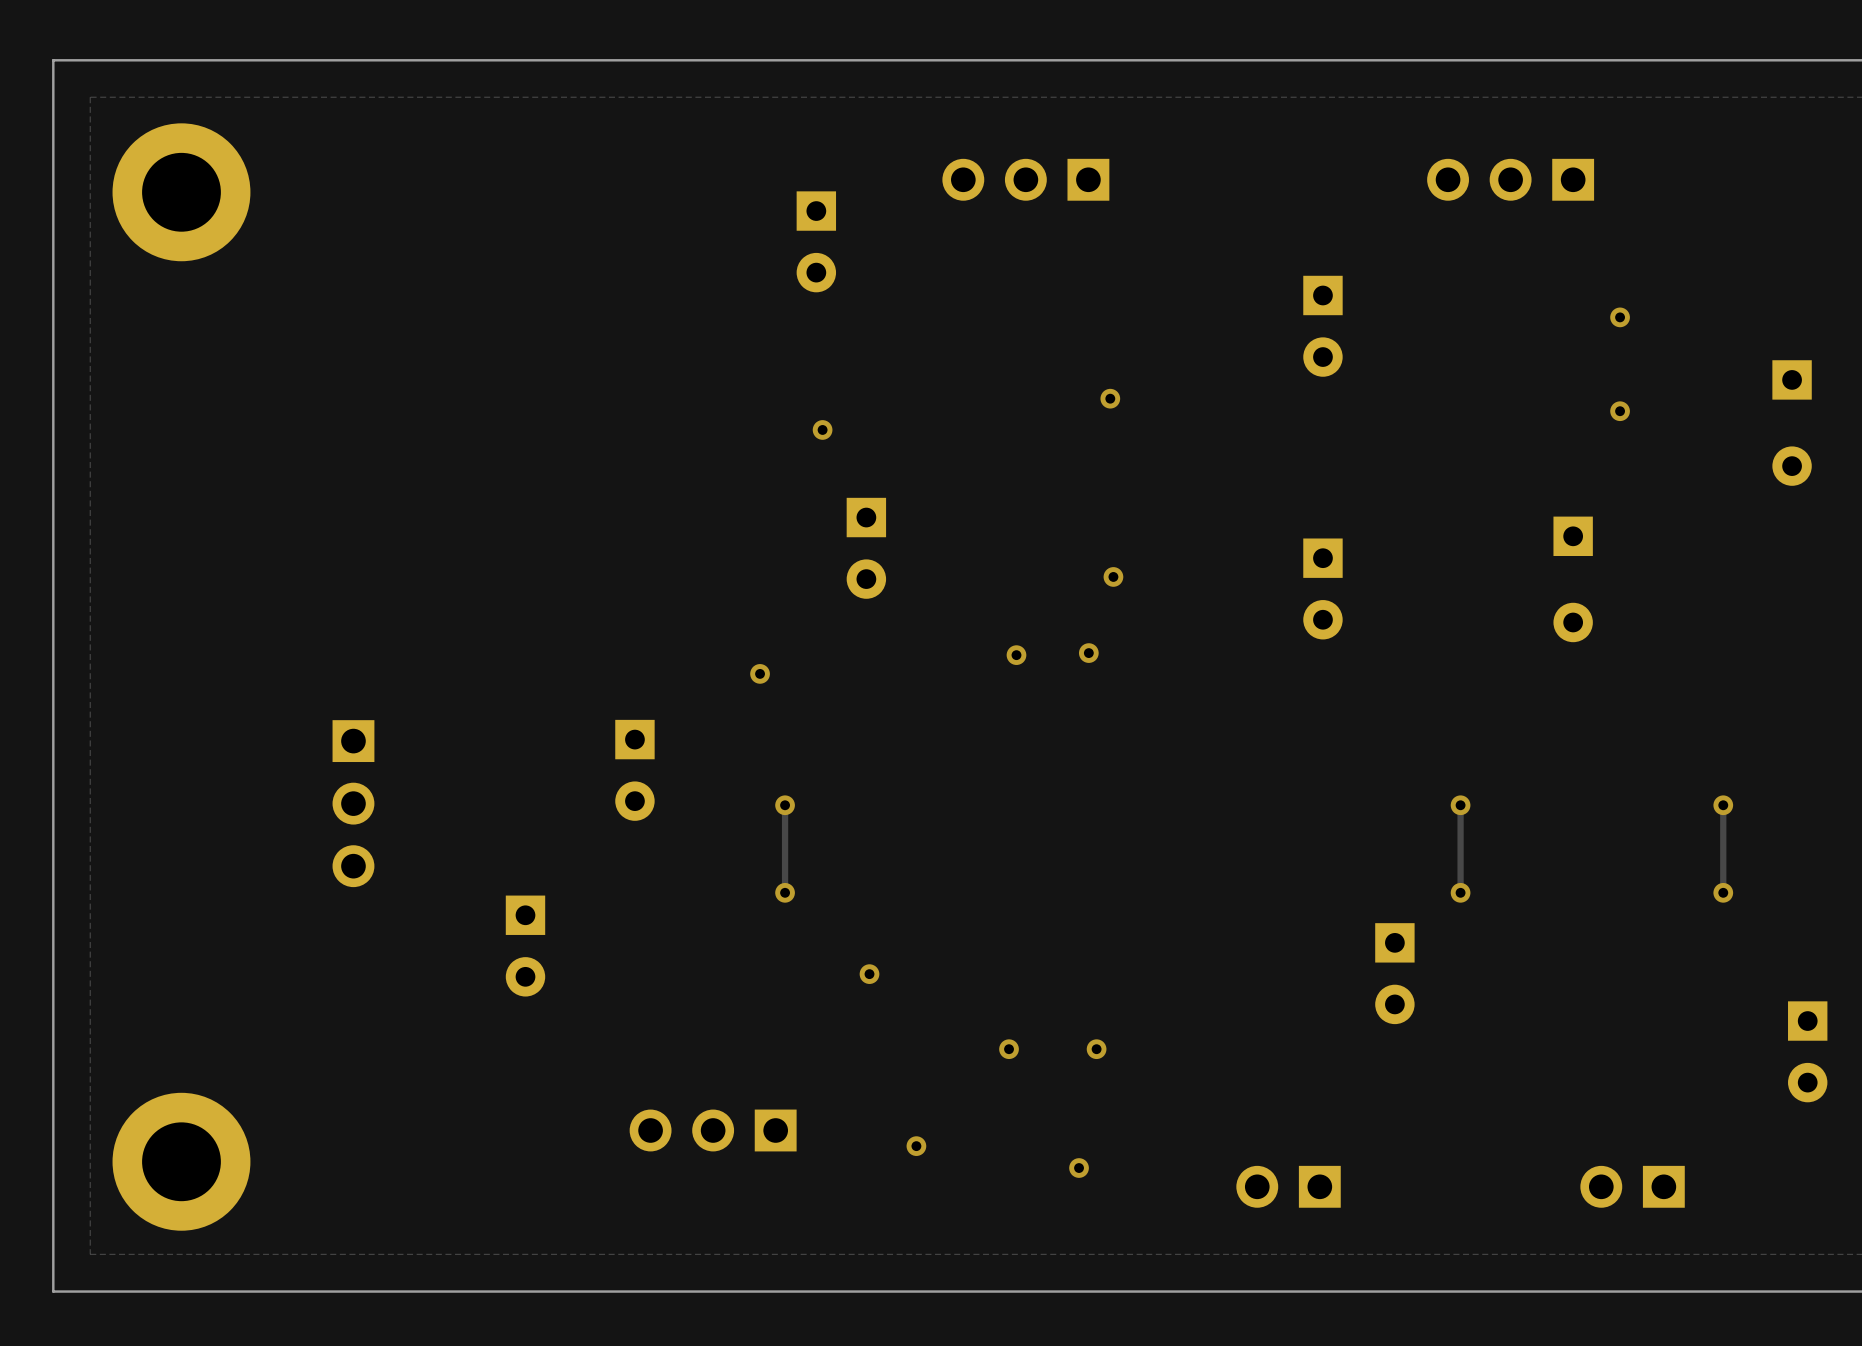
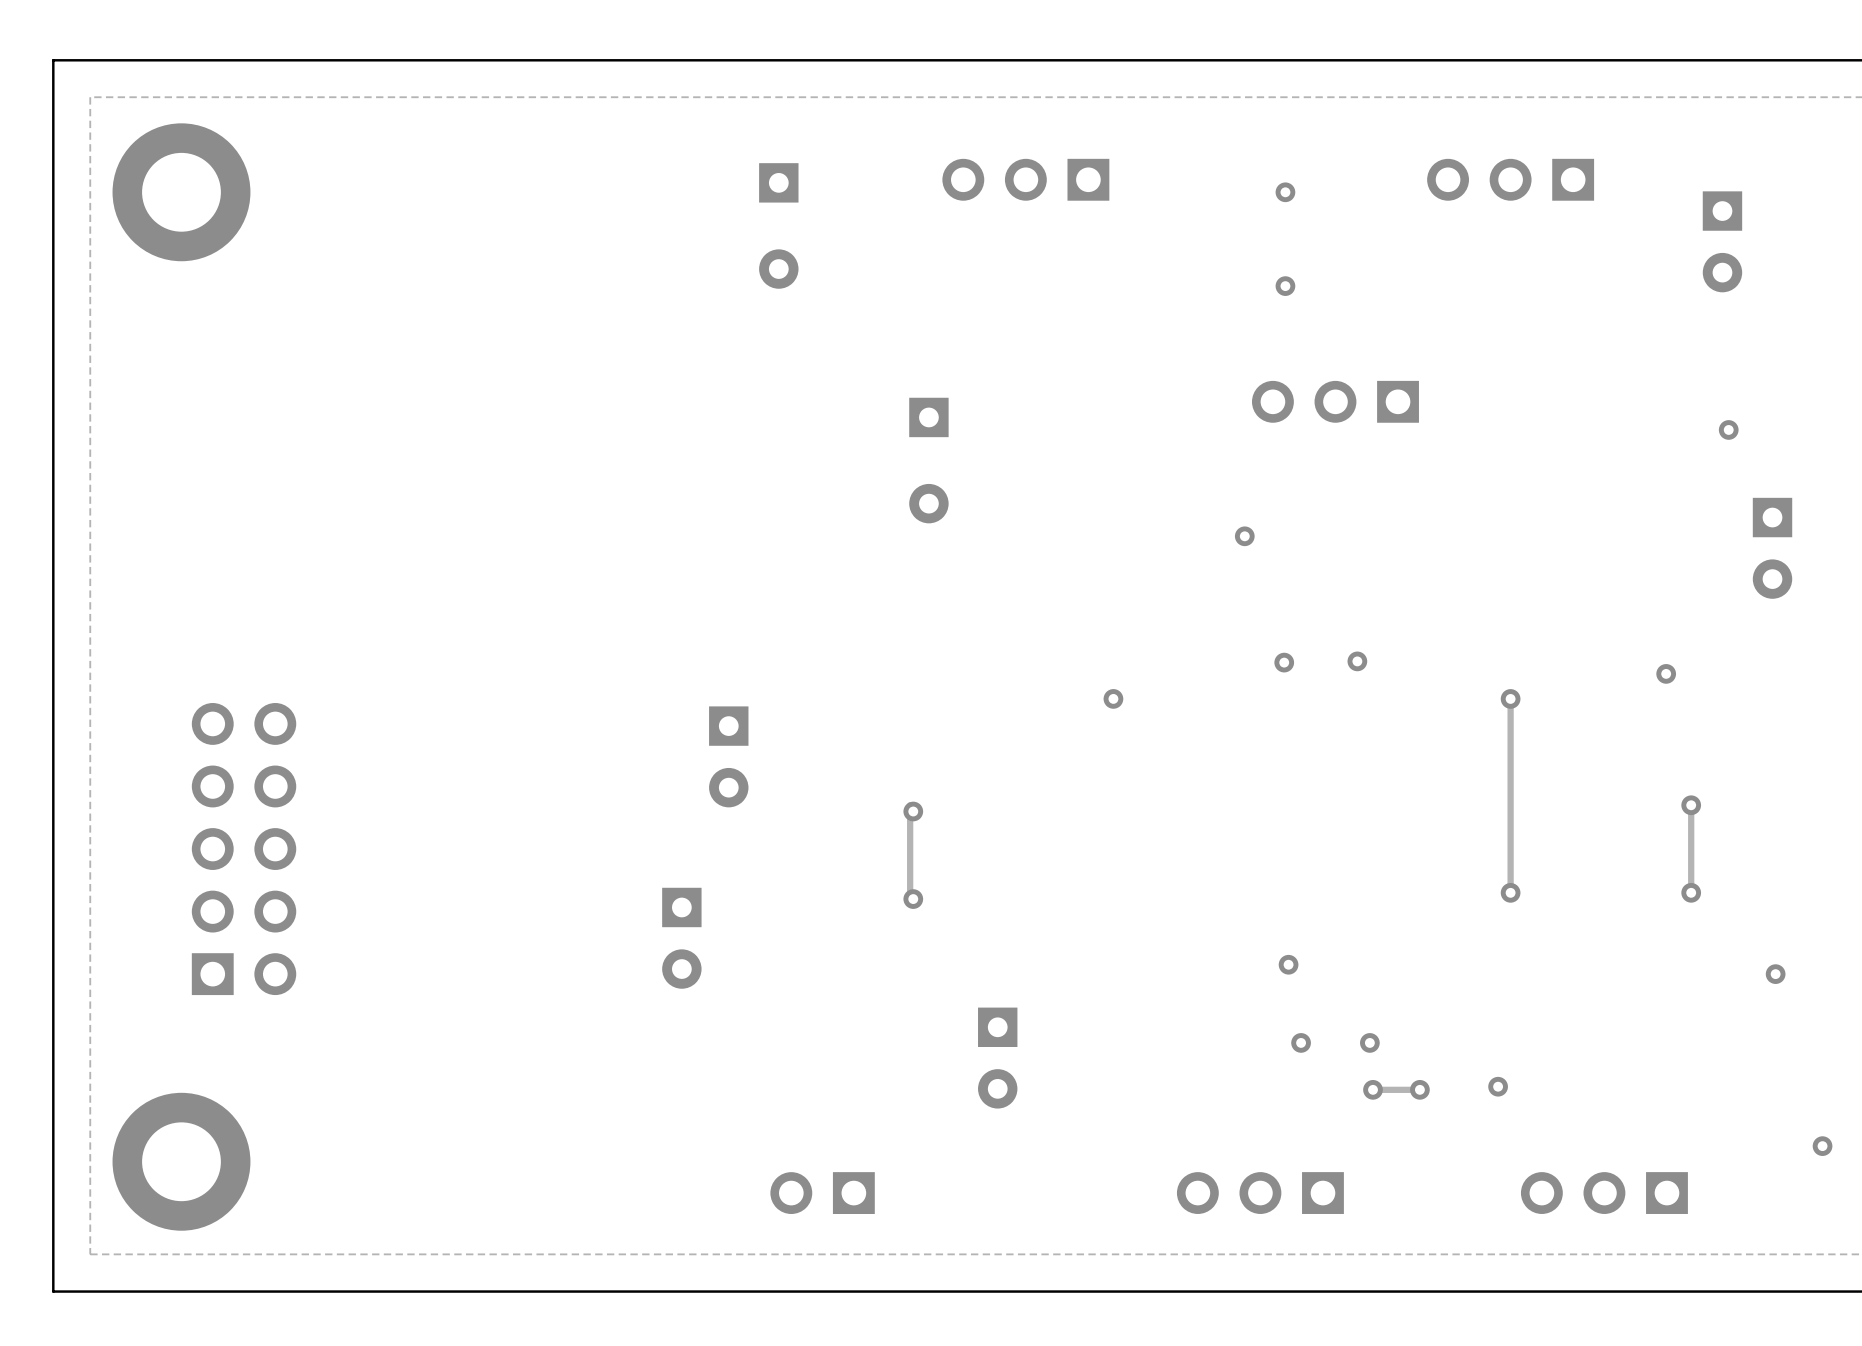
via: none -> (1285, 192)
part: none -> (778, 225)
part: (816, 241) -> none
part: none -> (1722, 241)
via: none -> (1285, 286)
via: (1620, 317) -> none
part: (1322, 326) -> none
via: (1110, 398) -> none
part: none -> (1335, 401)
via: (1620, 411) -> none
part: (1792, 423) -> none
via: (822, 429) -> none
via: none -> (1728, 429)
part: none -> (928, 460)
via: none -> (1244, 536)
part: (866, 548) -> none
part: none -> (1772, 548)
via: (1113, 576) -> none
part: (1573, 579) -> none
part: (1322, 588) -> none
via position: (1088, 653) -> (1113, 698)
via: (1016, 655) -> none
via: none -> (1357, 661)
via: none -> (1284, 662)
via: (760, 673) -> none
via: none -> (1666, 673)
track: none -> (1510, 695) (1510, 889)
via: none -> (1510, 698)
part: none -> (728, 756)
part: (634, 770) -> none
part: (353, 803) -> none
track: (785, 805) (785, 892) -> (910, 805) (910, 892)
via: (785, 805) -> none
track: (1460, 805) (1460, 892) -> none
via: (1460, 805) -> none
track: (1723, 805) (1723, 892) -> (1691, 805) (1691, 892)
via position: (1723, 805) -> (1691, 805)
via: none -> (913, 811)
part: none -> (244, 849)
via: (785, 892) -> none
via position: (1460, 892) -> (1510, 892)
via position: (1723, 892) -> (1691, 892)
via: none -> (913, 899)
part: none -> (681, 938)
part: (525, 946) -> none
via: none -> (1288, 964)
part: (1394, 973) -> none
via: (869, 974) -> none
via: none -> (1775, 974)
via: none -> (1301, 1042)
via: none -> (1369, 1042)
via: (1009, 1049) -> none
via: (1096, 1049) -> none
part: (1807, 1051) -> none
part: none -> (997, 1058)
via: none -> (1498, 1086)
via: none -> (1373, 1089)
track: none -> (1419, 1089) (1373, 1089)
via: none -> (1419, 1089)
part: (713, 1130) -> none
via: (916, 1146) -> none
via: none -> (1822, 1146)
via: (1079, 1168) -> none
part: (1288, 1186) -> none
part: (1632, 1186) -> none
part: none -> (822, 1193)
part: none -> (1260, 1193)
part: none -> (1604, 1193)

